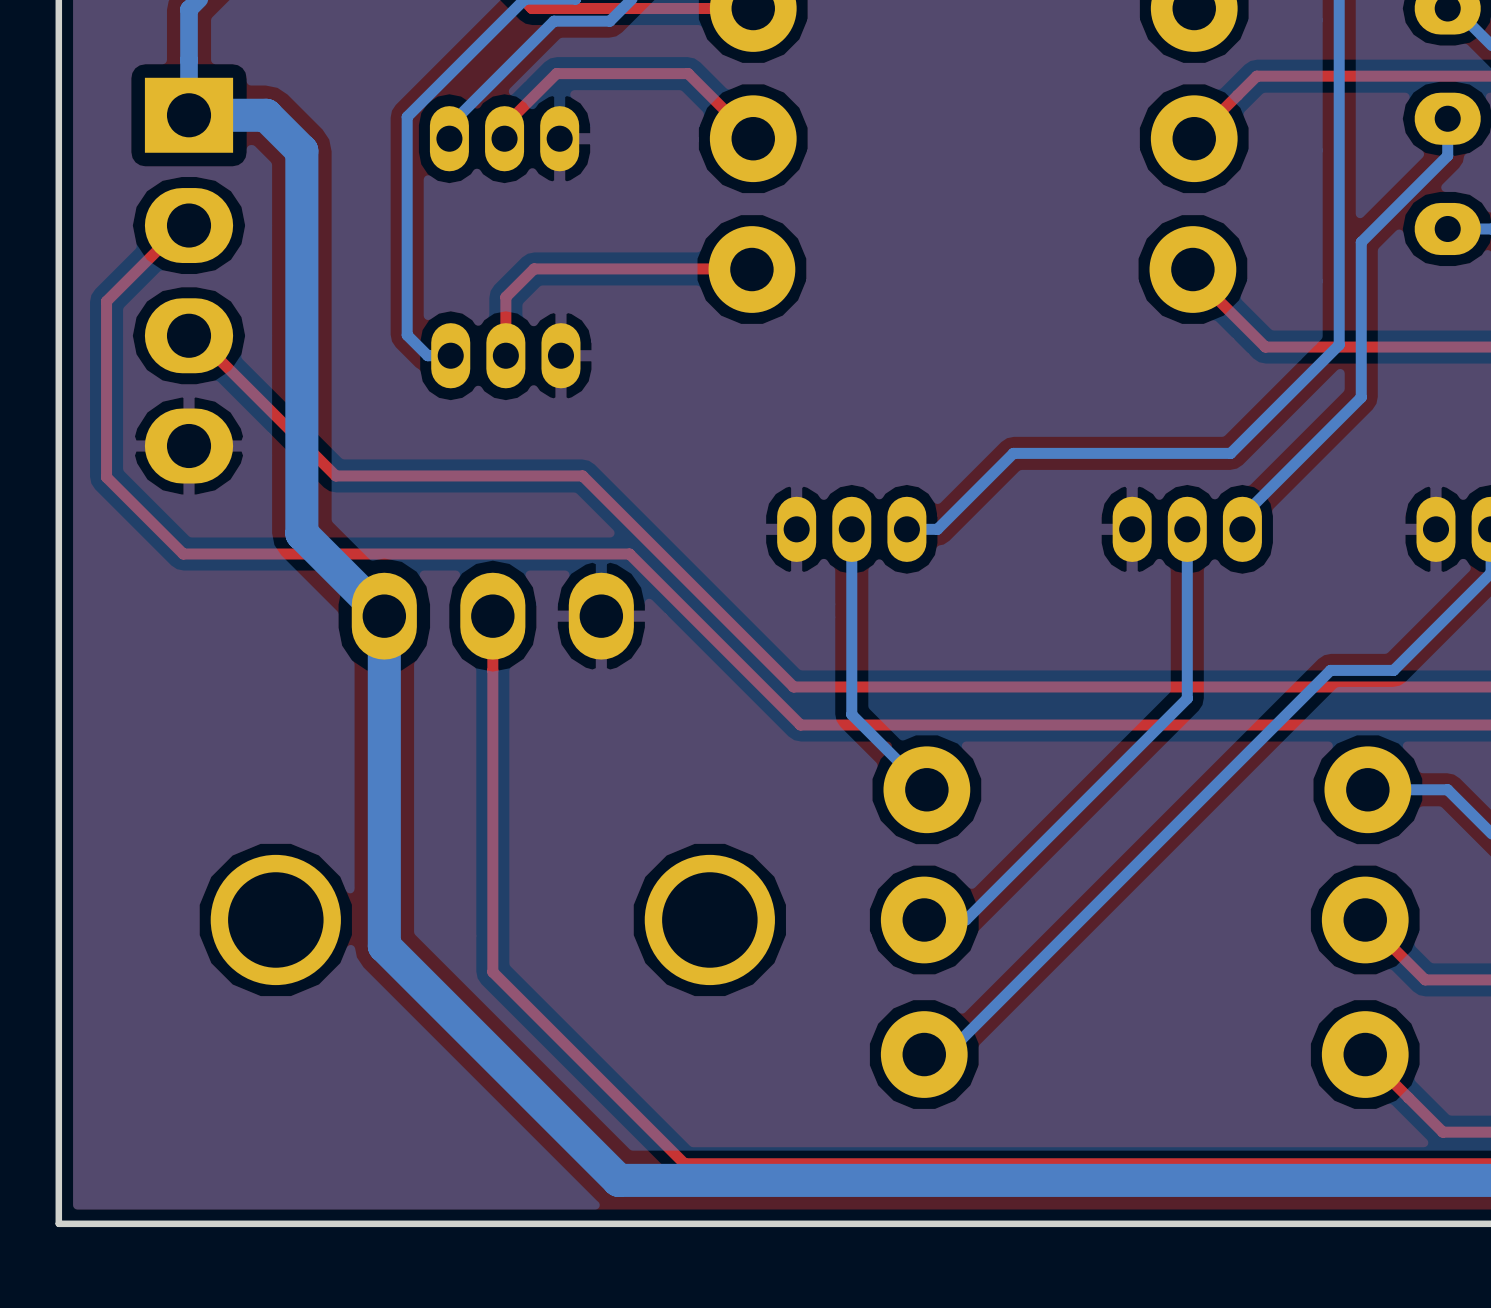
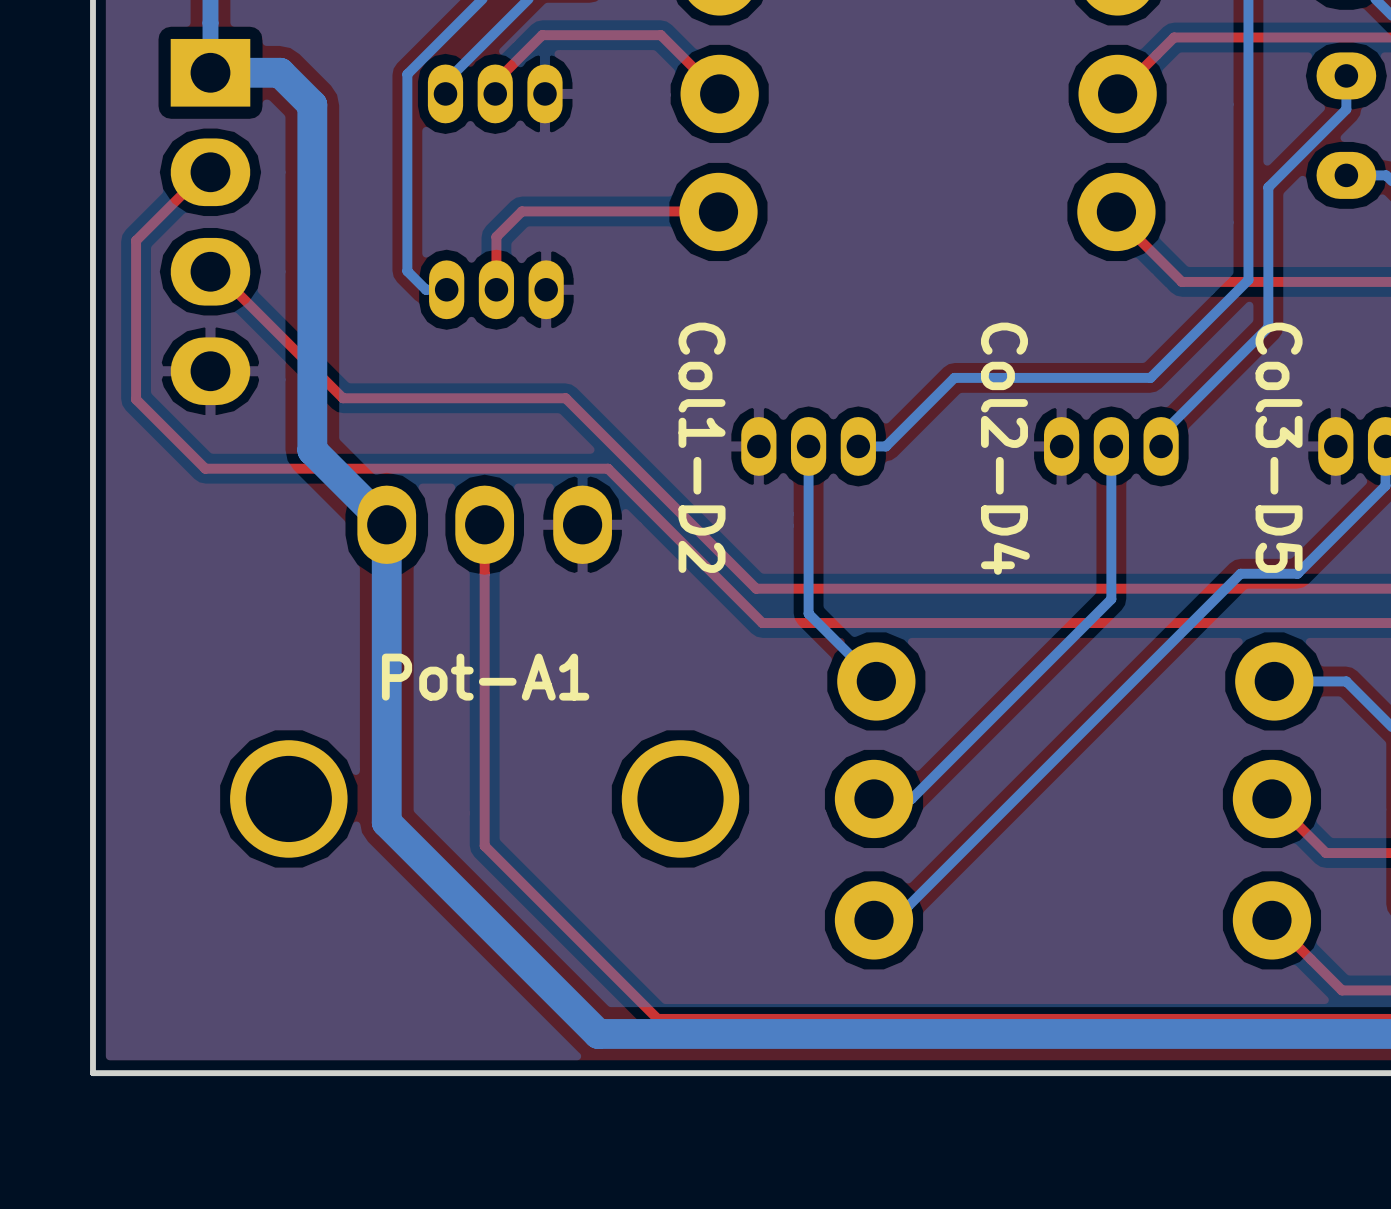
text: none -> Col1-D2 (702, 447)
text: none -> Col3-D5 (1279, 447)
text: none -> Col2-D4 (1005, 448)
text: none -> Pot-A1 (485, 677)

